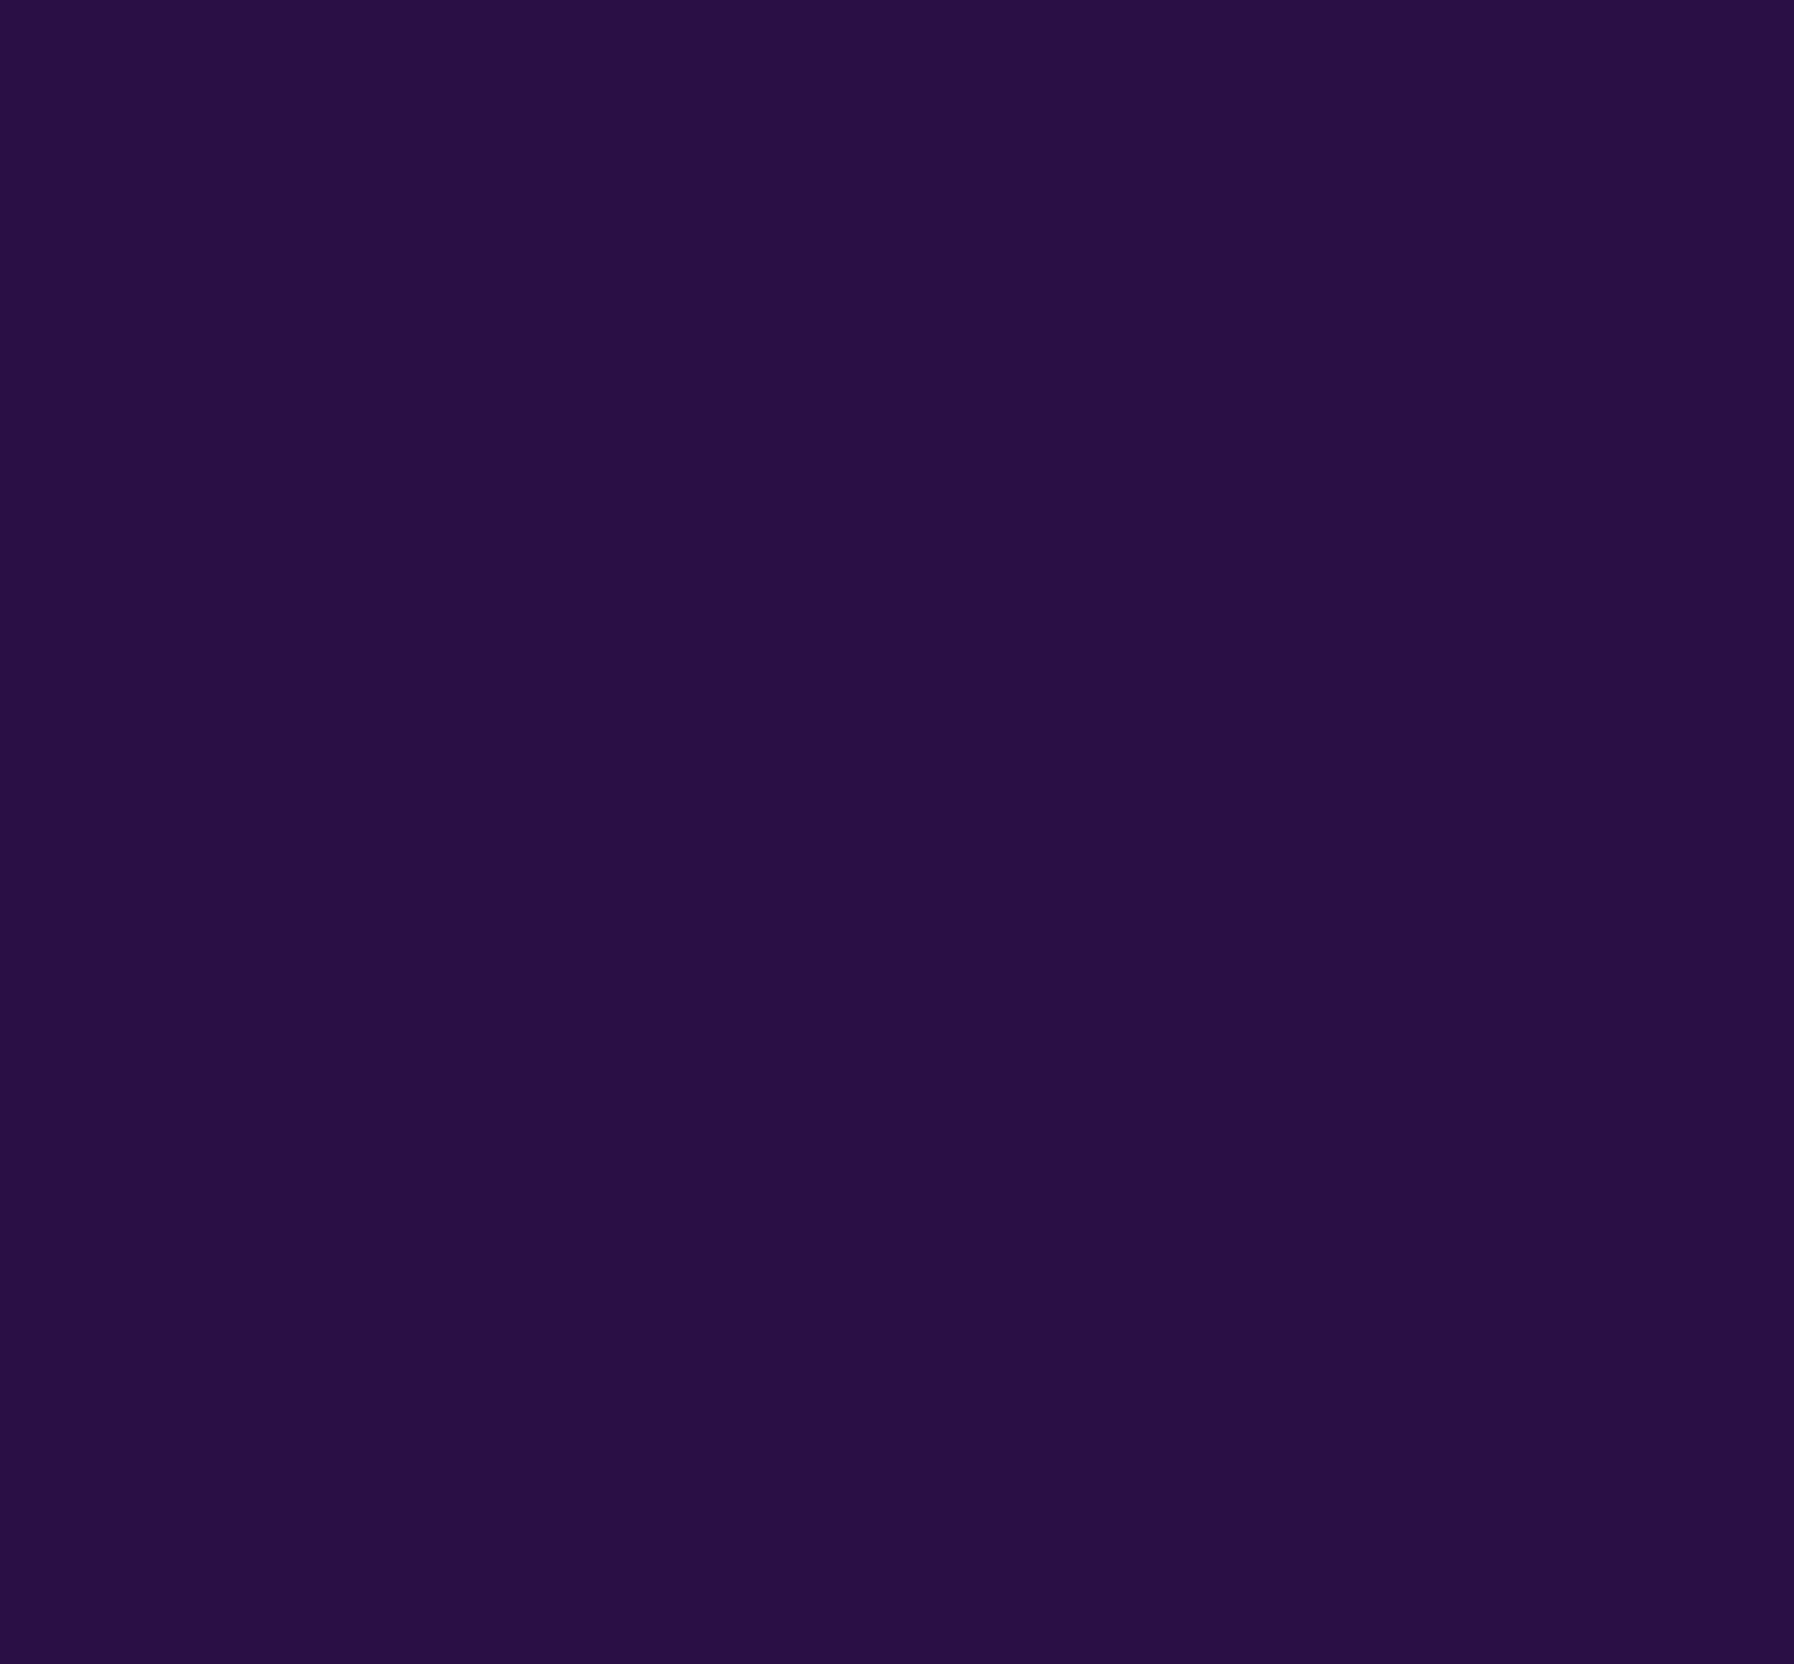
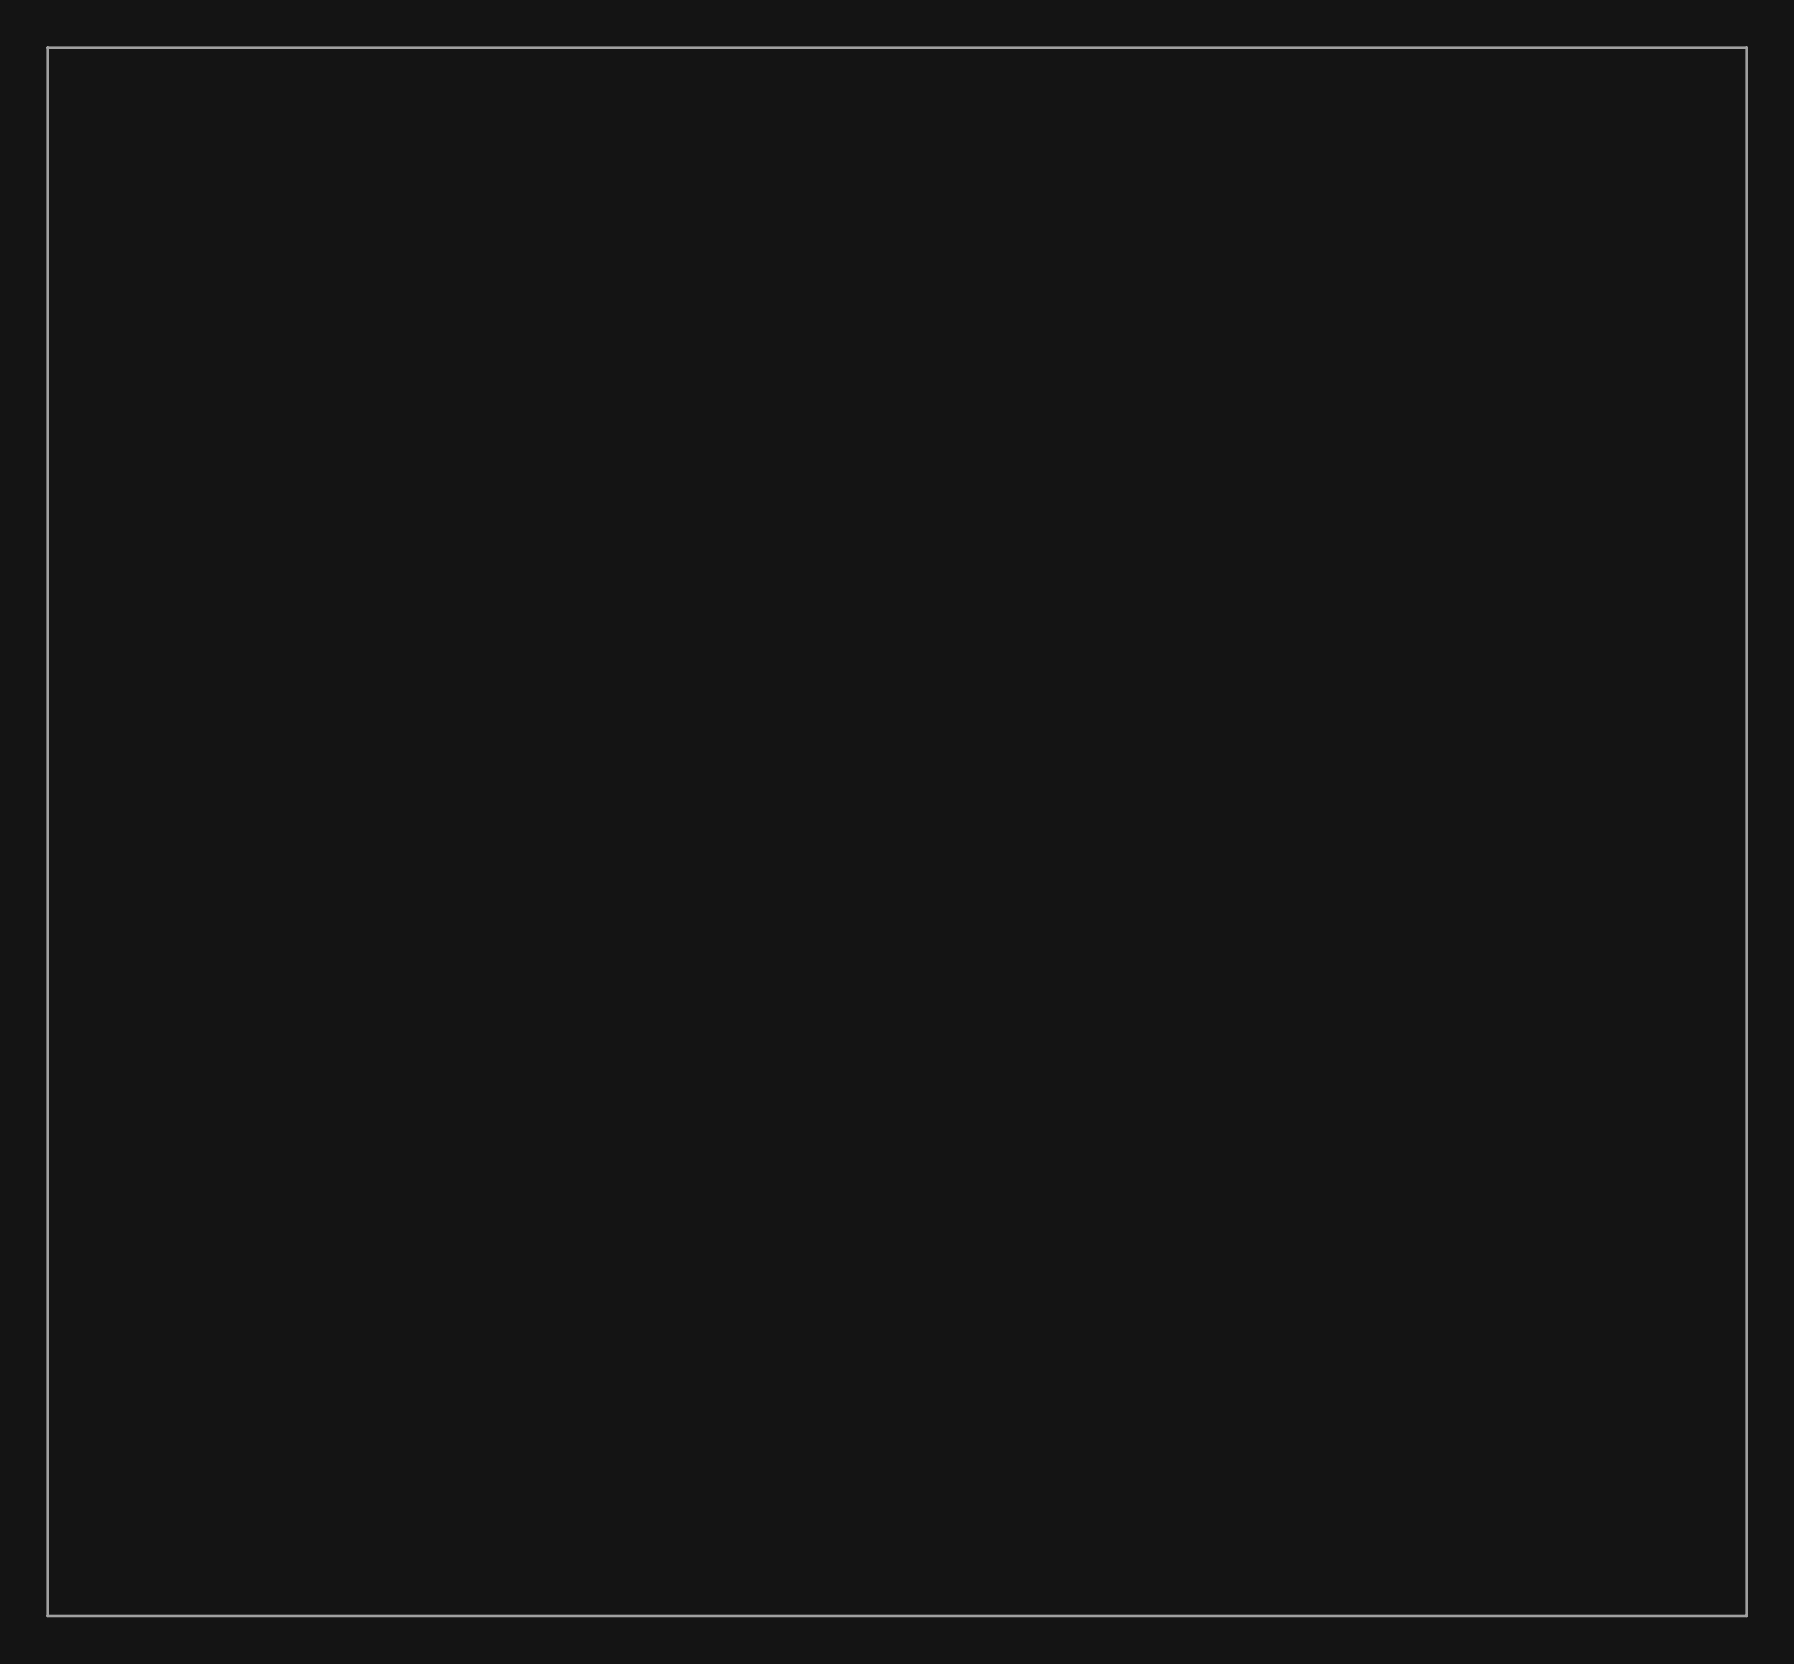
board edge: none -> (1746, 47) (47, 47) (47, 1615) (1746, 1615) (1746, 47)

